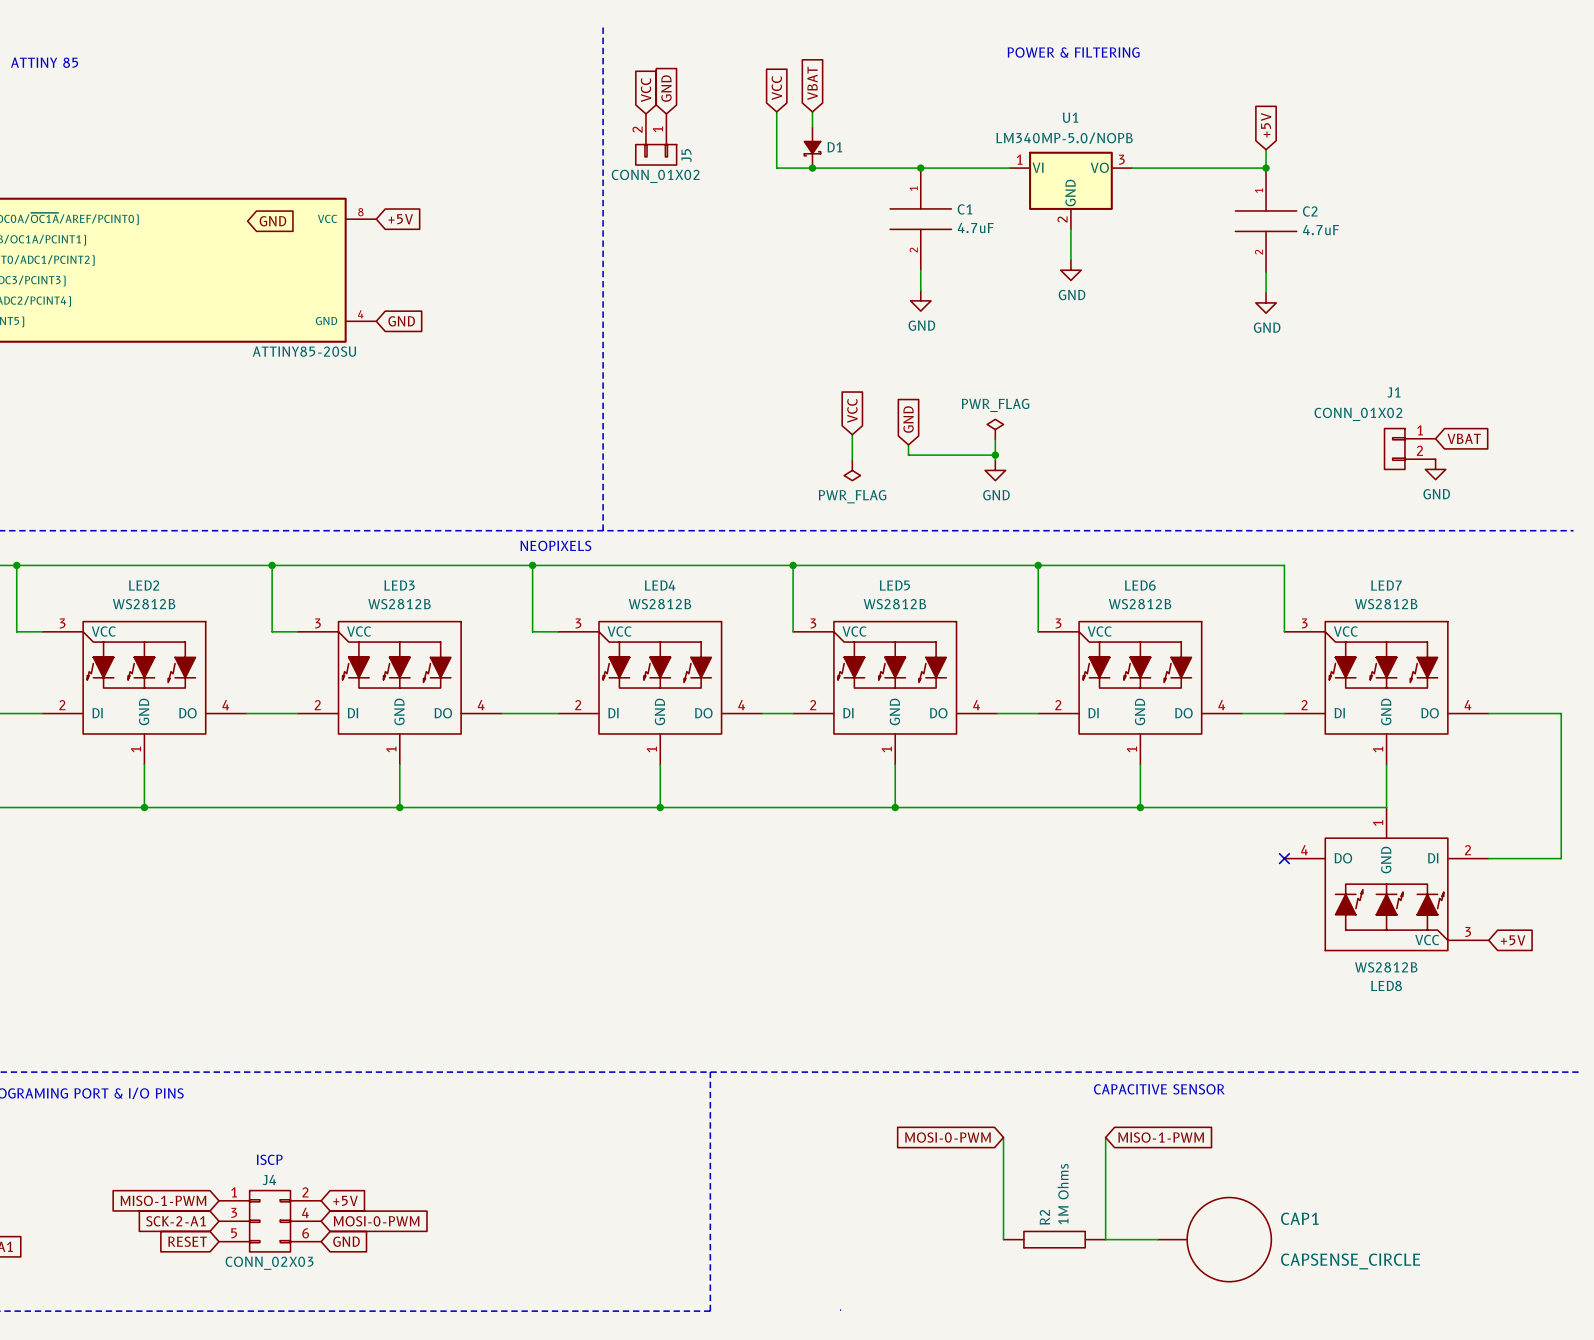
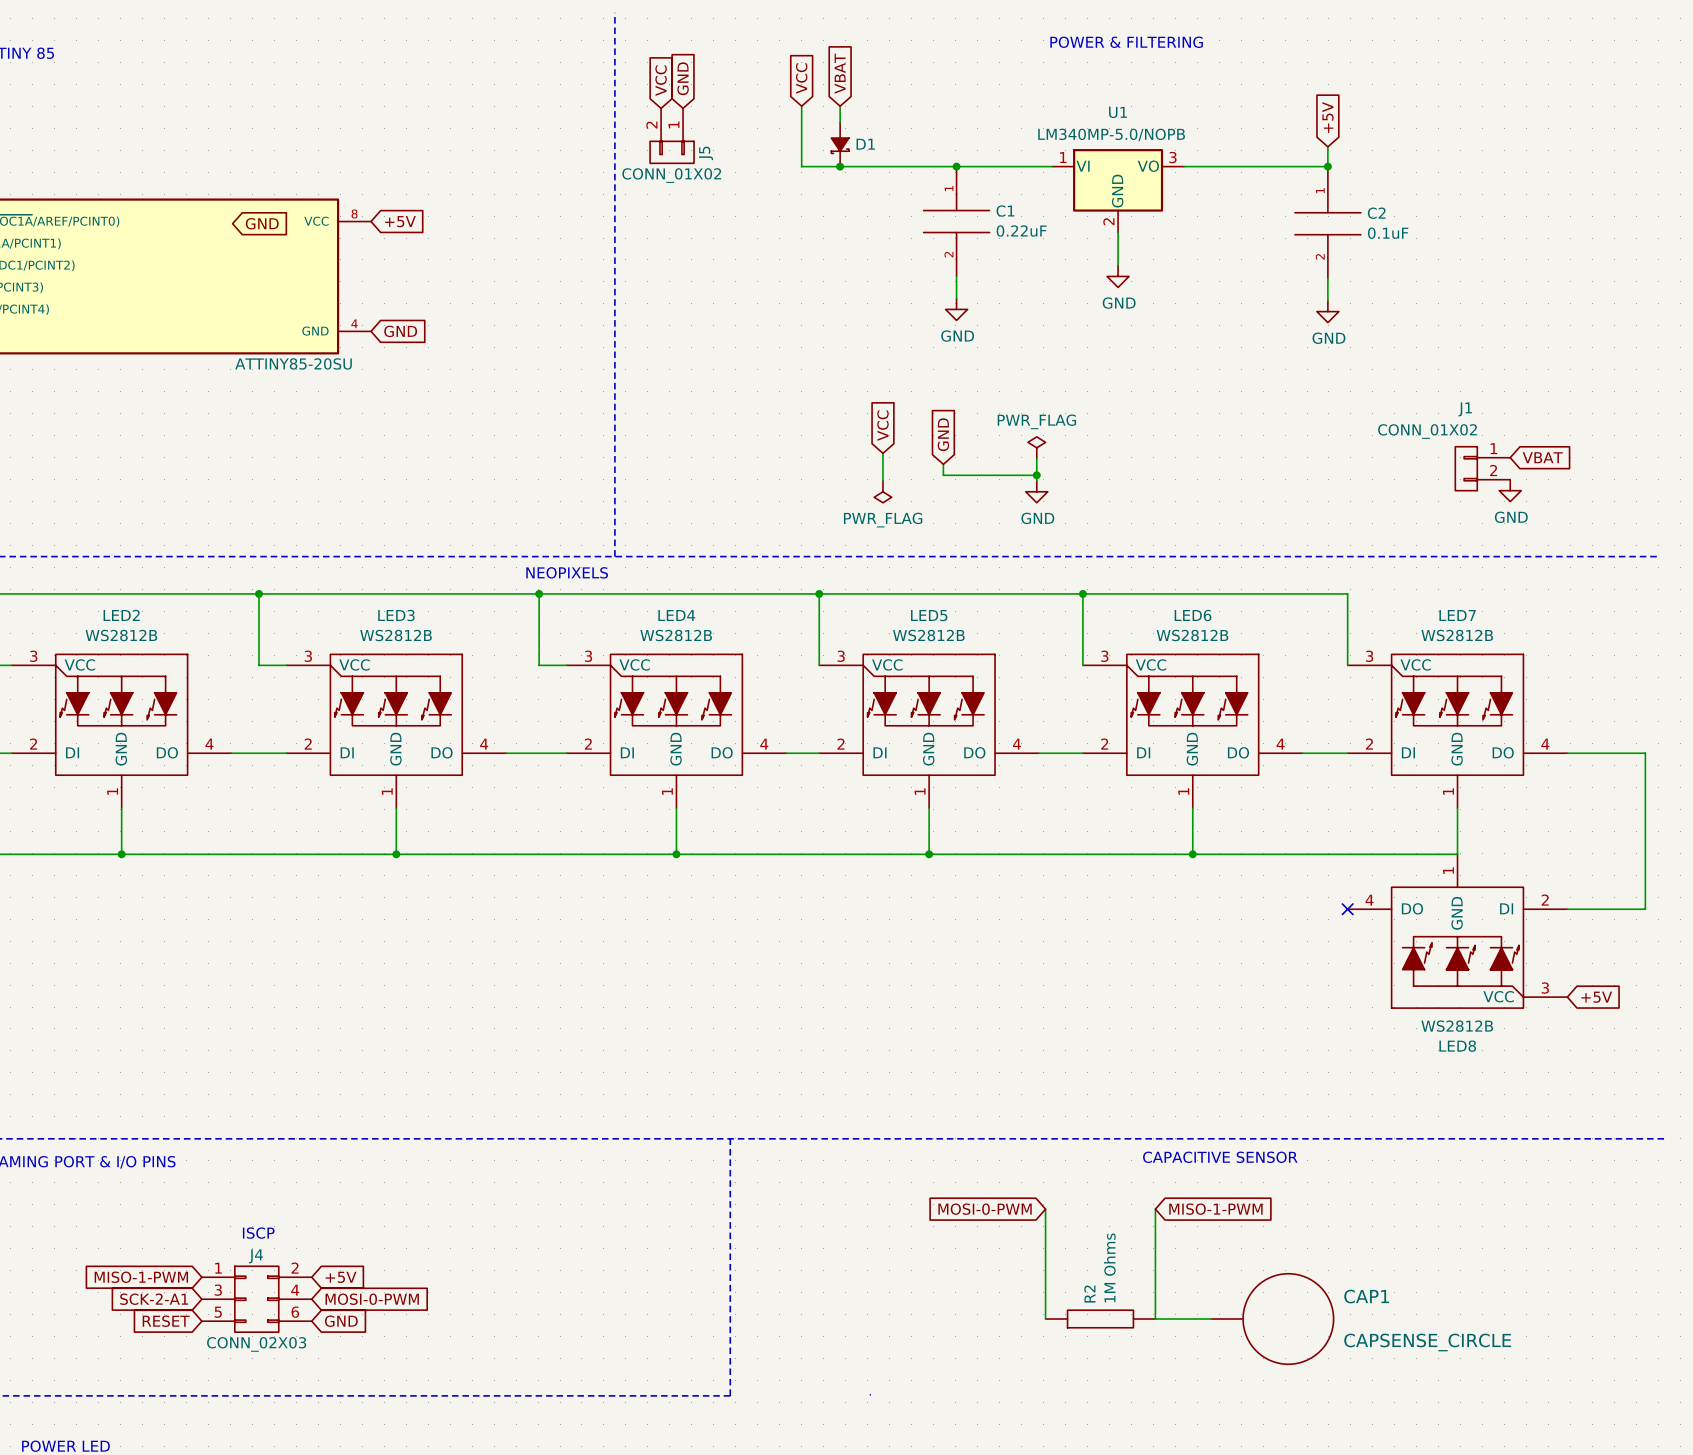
C1 value: 4.7uF (975, 228) -> 0.22uF (1021, 231)
C2 value: 4.7uF (1321, 230) -> 0.1uF (1388, 233)

